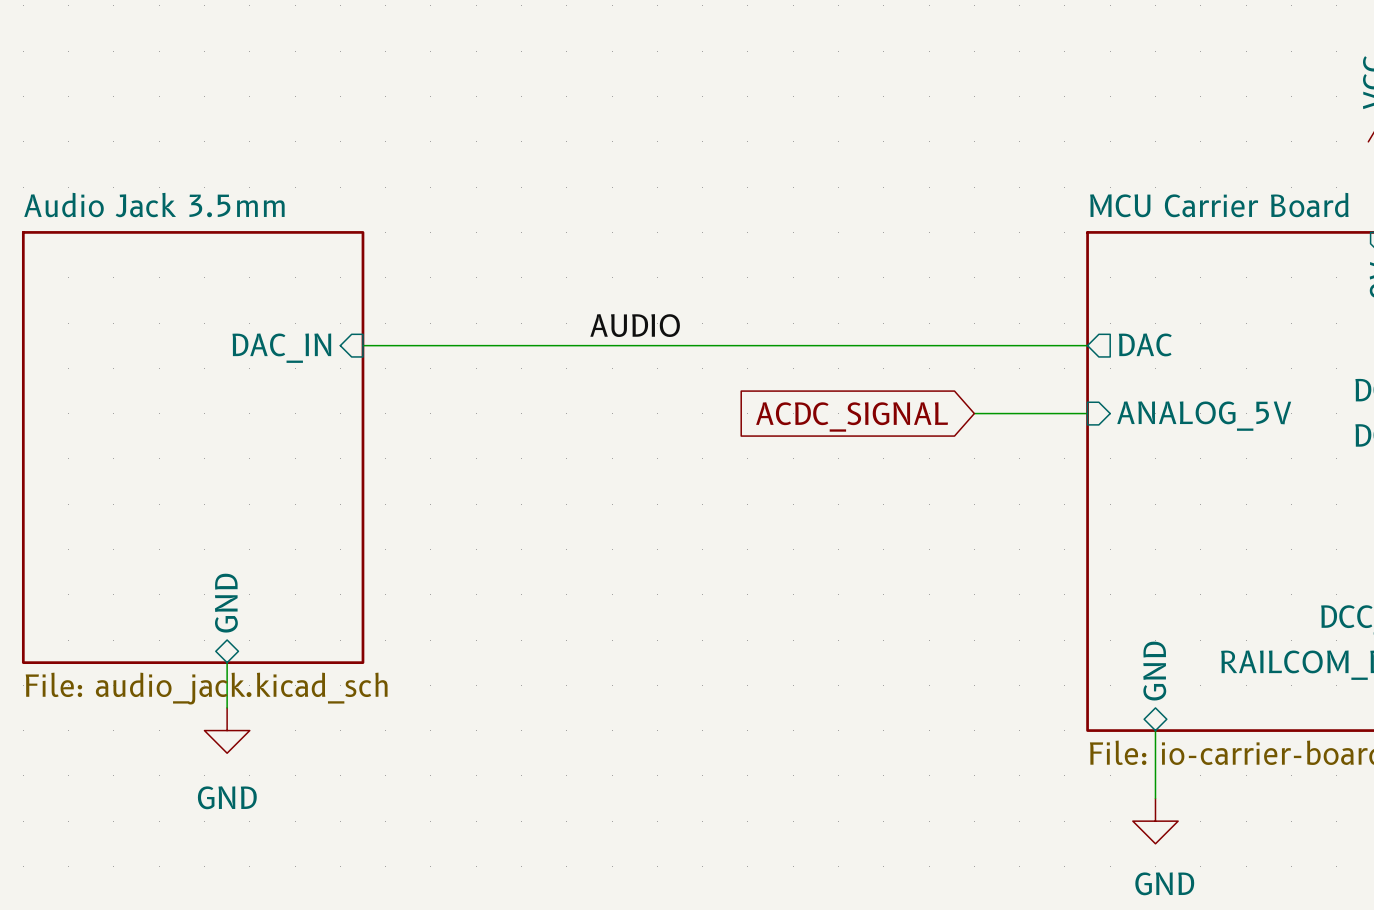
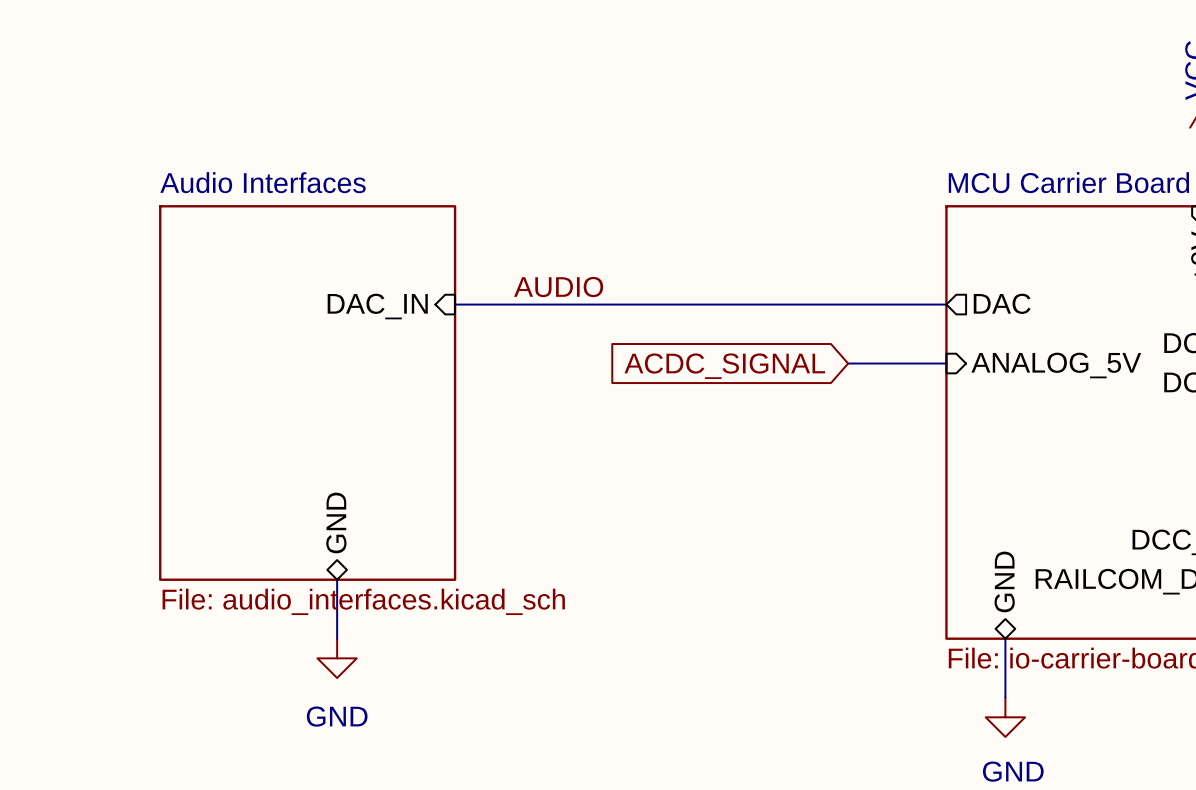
wire: (362, 345) (521, 345) -> none
sheet pin position: DAC_IN (281, 348) -> DAC_IN (377, 306)
sheet Audio Jack 3.5mm: File: audio_jack.kicad_sch (193, 447) -> none
sheet Audio Interfaces: none -> File: audio_interfaces.kicad_sch (307, 393)
sheet pin position: GND (226, 603) -> GND (336, 522)
wire: (227, 662) (227, 707) -> none
wire: none -> (337, 579) (337, 638)
power symbol position: GND (227, 730) -> GND (337, 658)

